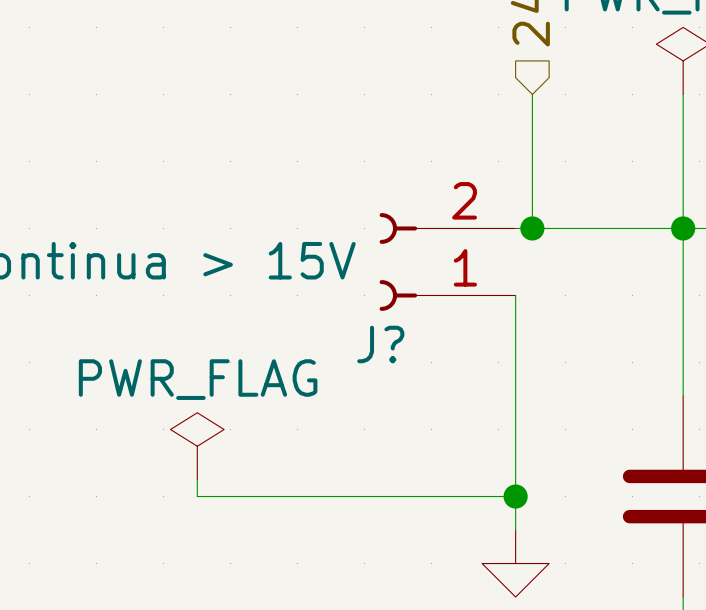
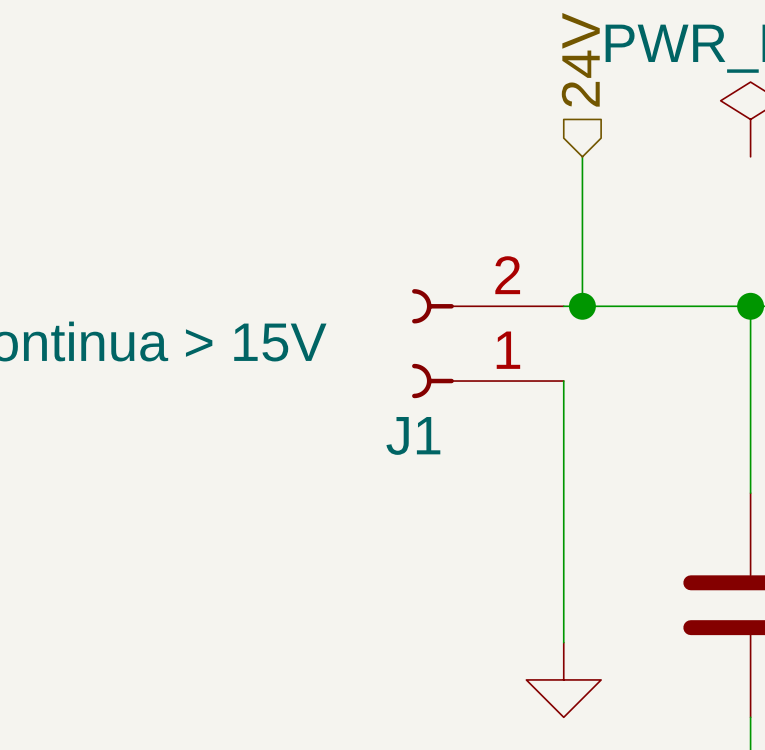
wire: (683, 94) (683, 228) -> none
J? name: J? (380, 344) -> J1 (413, 435)
power symbol: PWR_FLAG (197, 446) -> none
wire: (197, 479) (197, 496) (515, 496) -> none
junction: (515, 496) -> none

